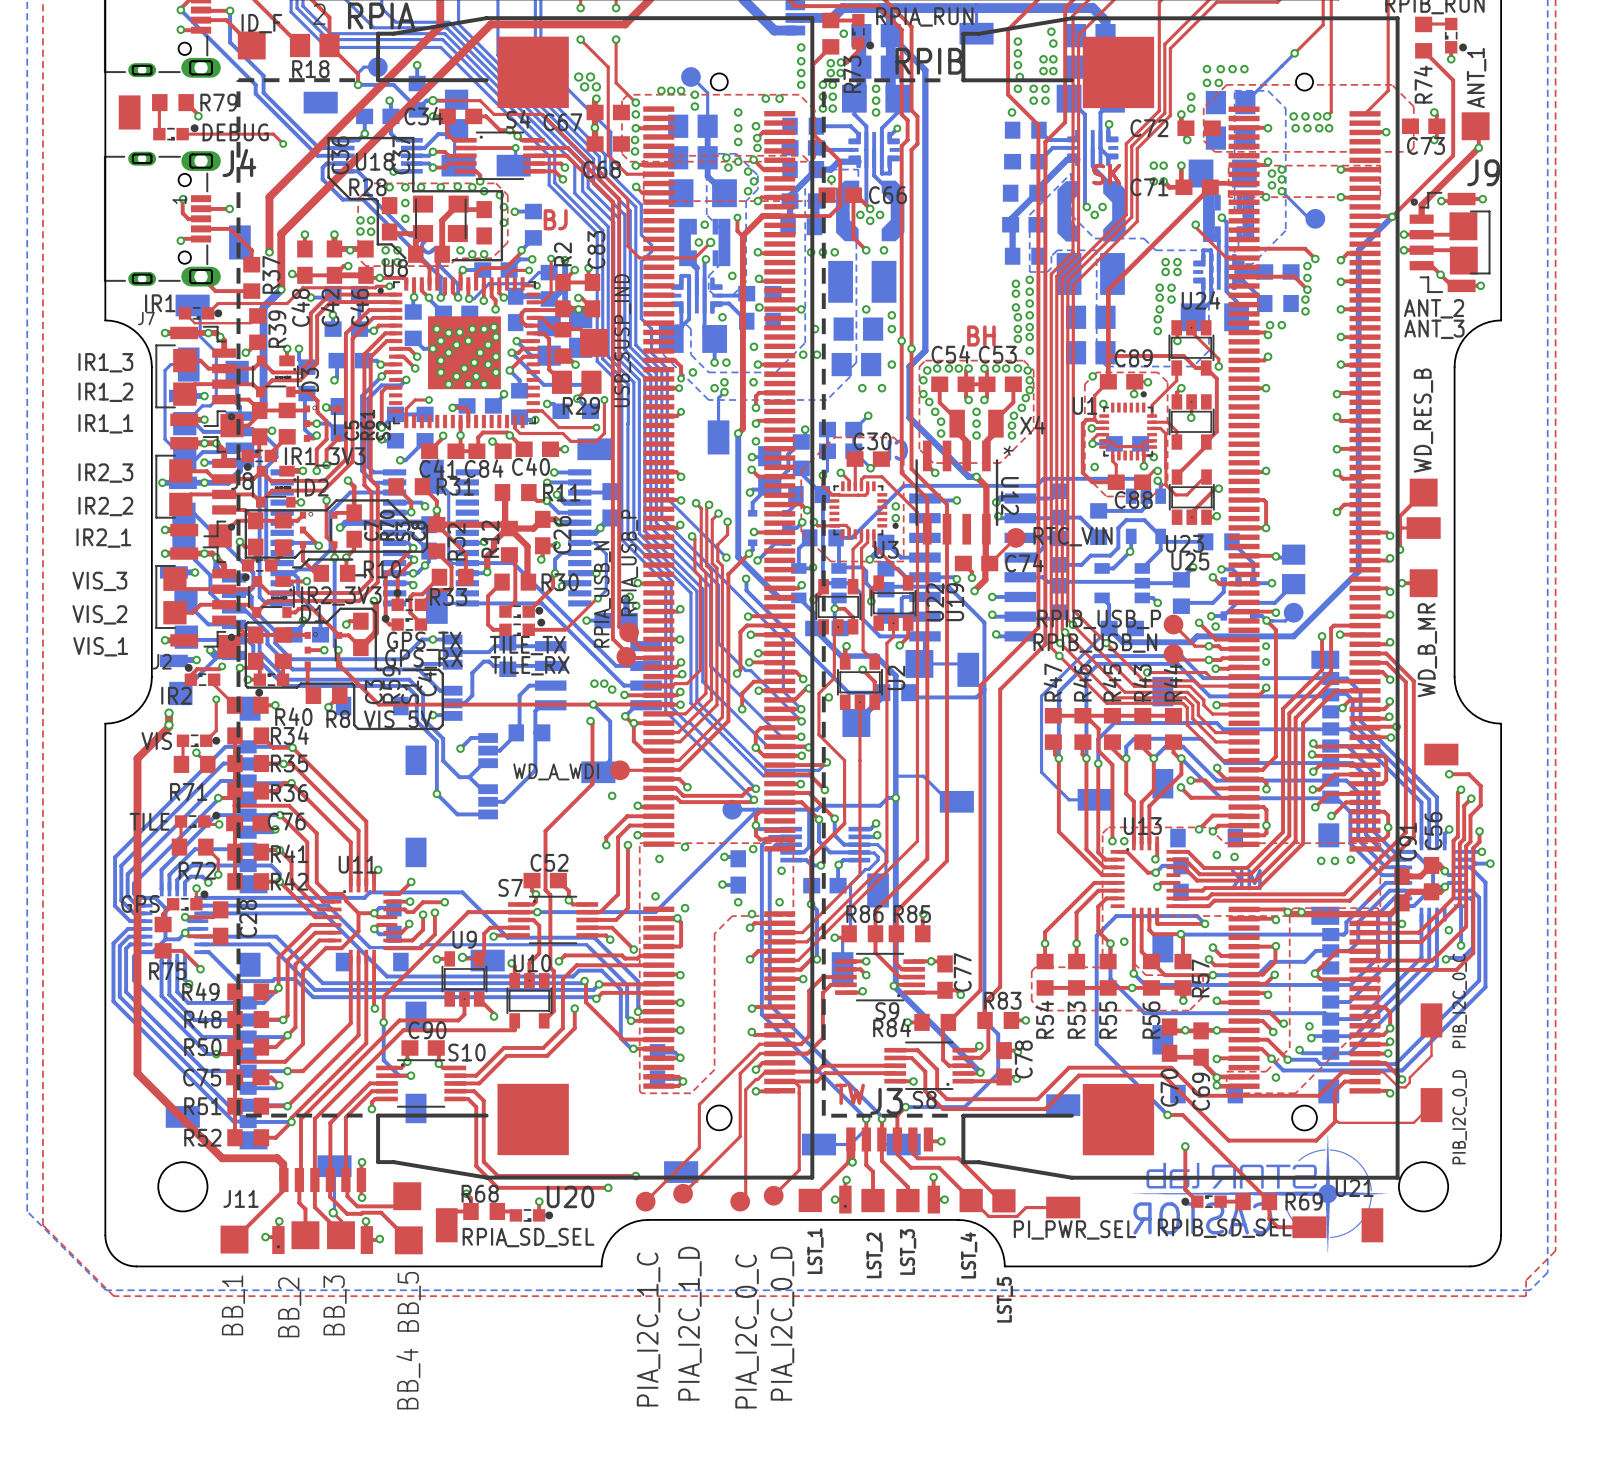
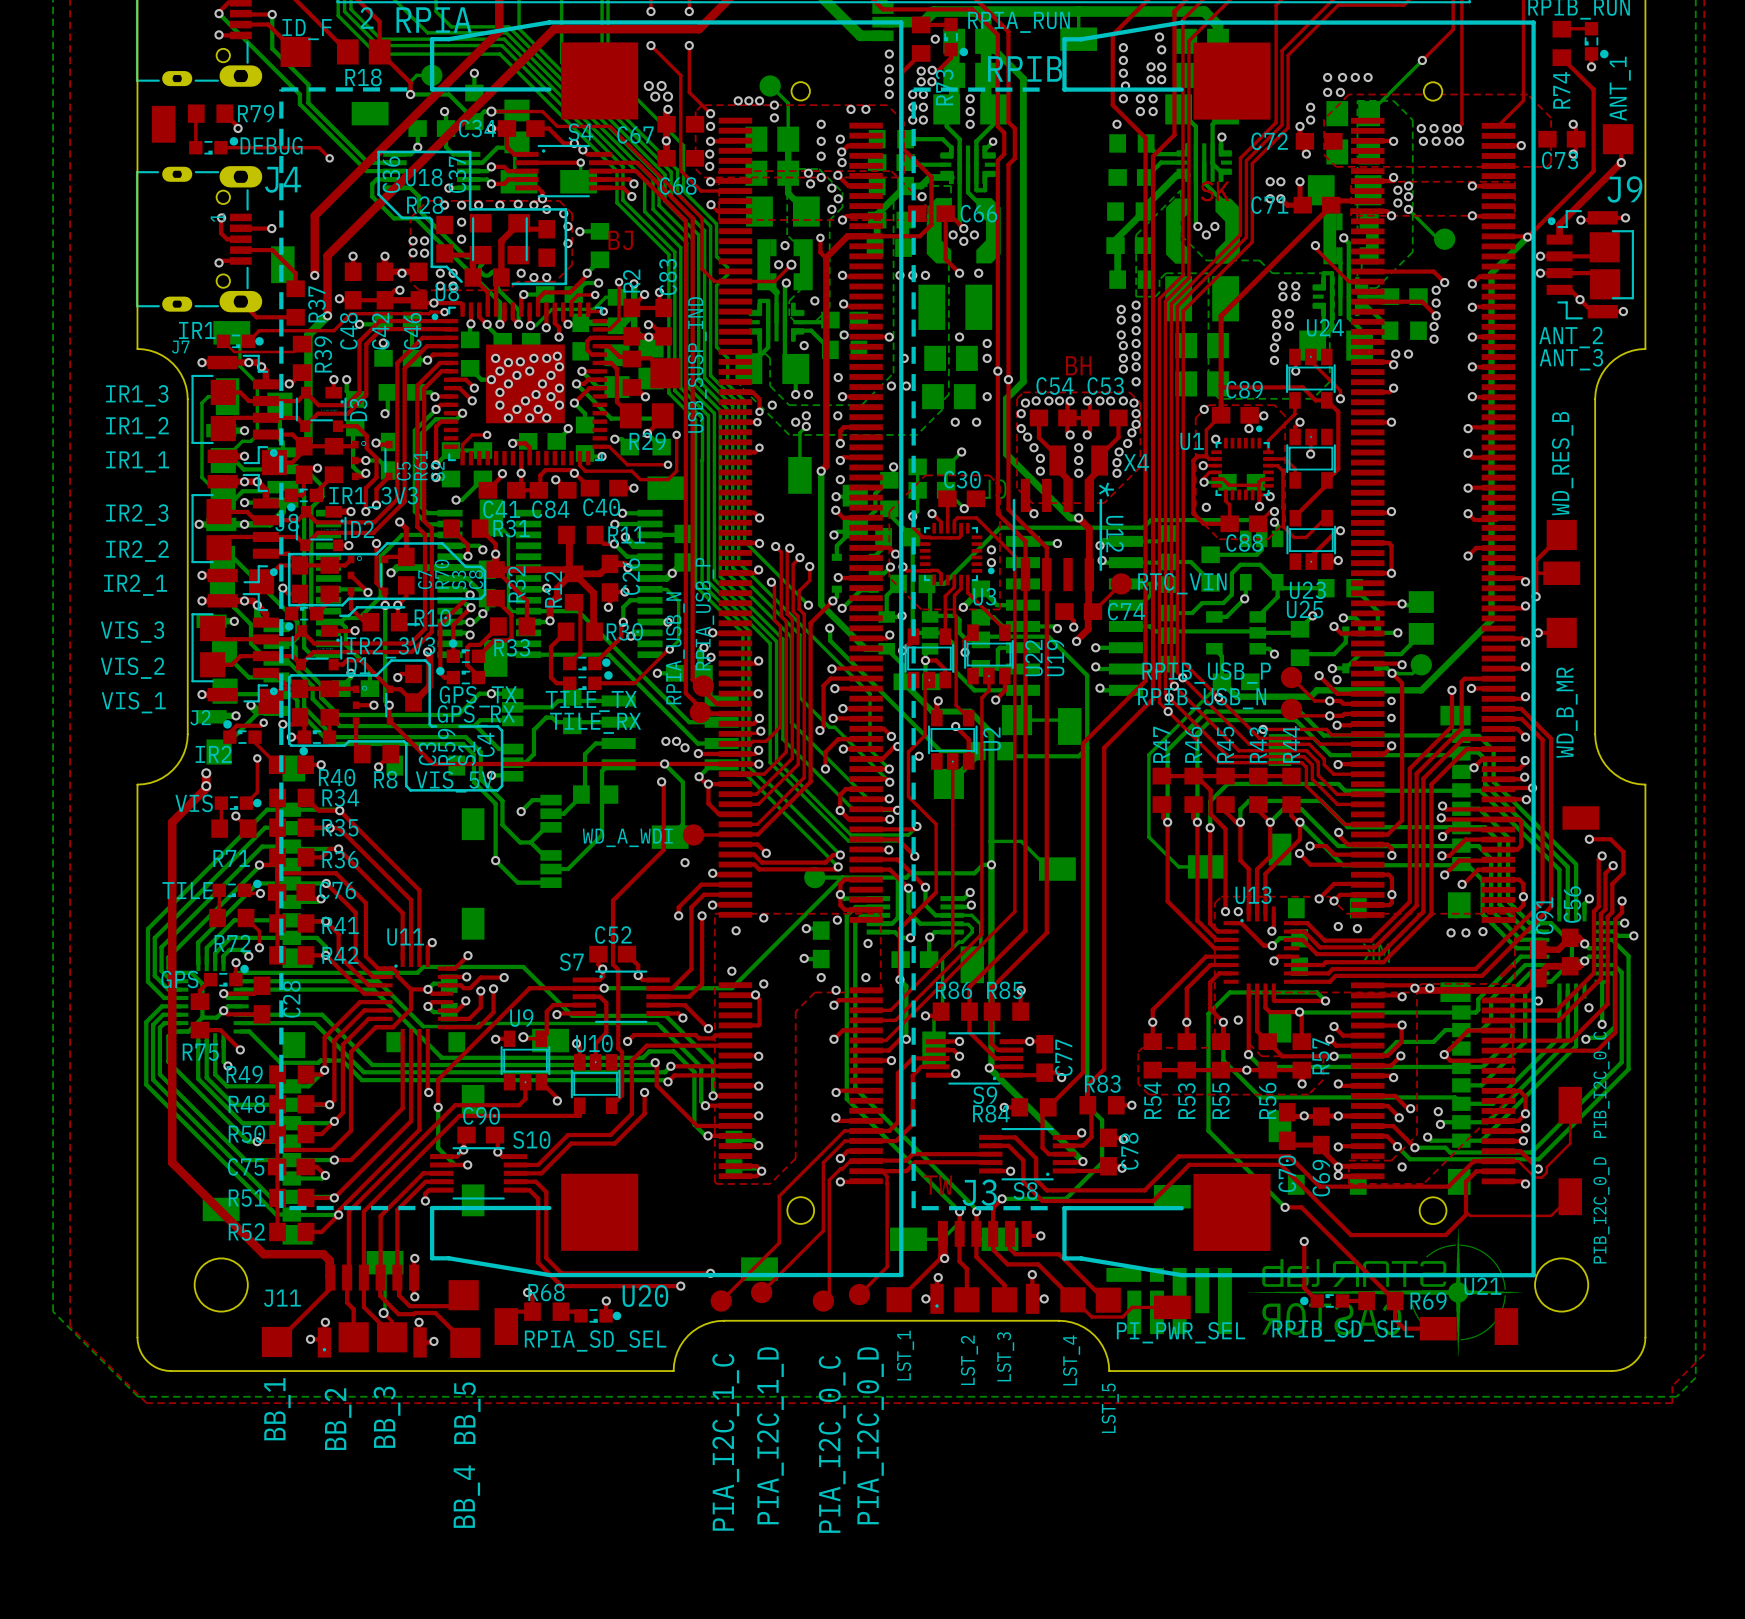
drawing: none -> [1106, 1267, 1232, 1335]

